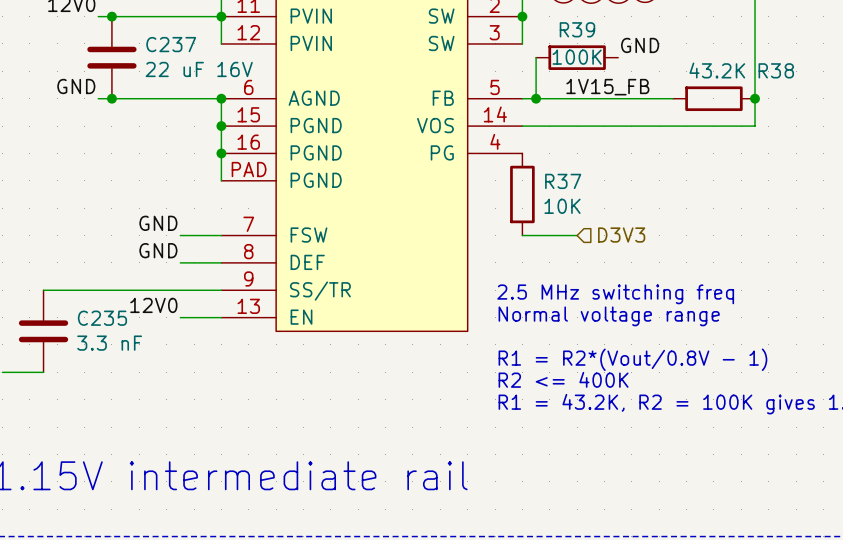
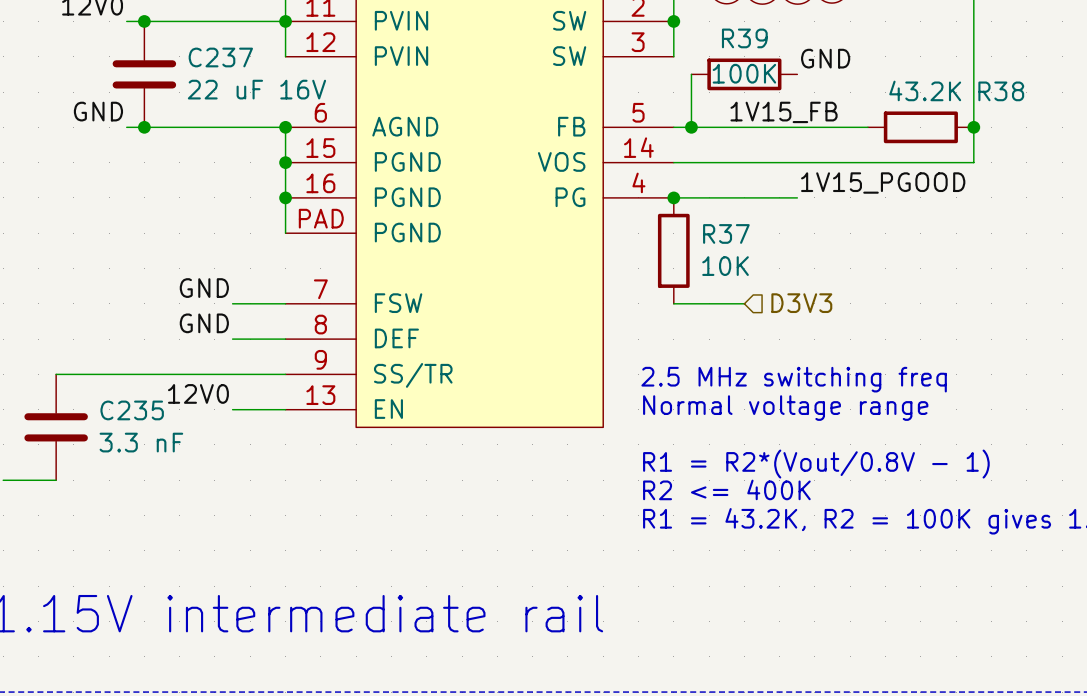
label: none -> 1V15_PGOOD (883, 183)
wire: none -> (673, 197) (797, 197)
junction: none -> (673, 197)

